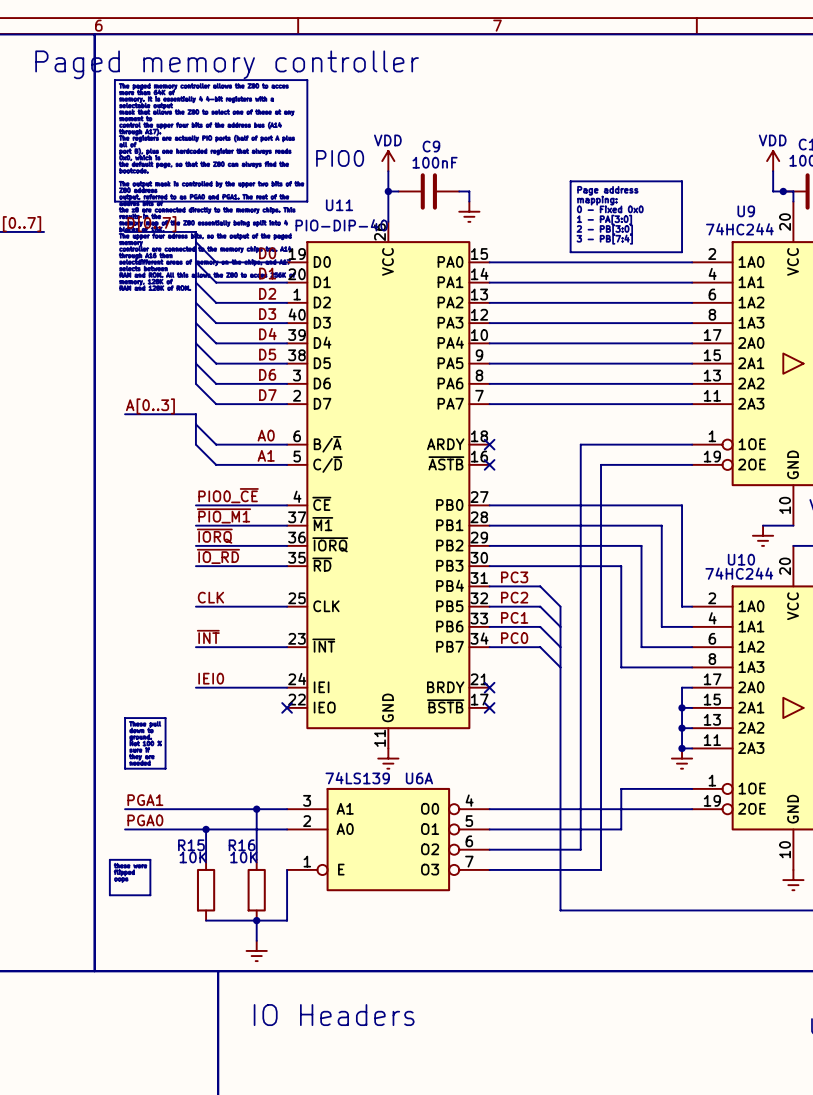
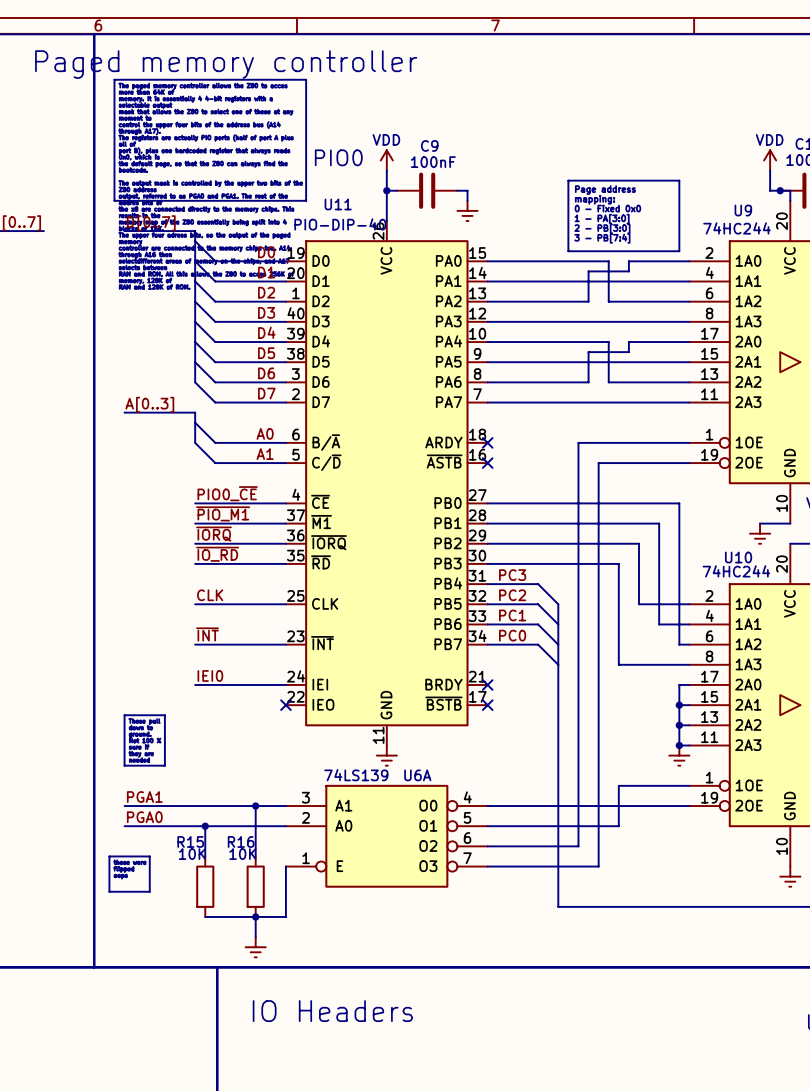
wire: (611, 262) (631, 262) -> (608, 261) (608, 301)
wire: (590, 302) (611, 302) -> (588, 301) (588, 271) (628, 271) (628, 261)
wire: (611, 343) (631, 343) -> (608, 342) (608, 382)
wire: (590, 383) (611, 383) -> (588, 382) (588, 352) (628, 352) (628, 342)
wire: (641, 606) (641, 647) (682, 647) -> (638, 604) (679, 604) (679, 644)

